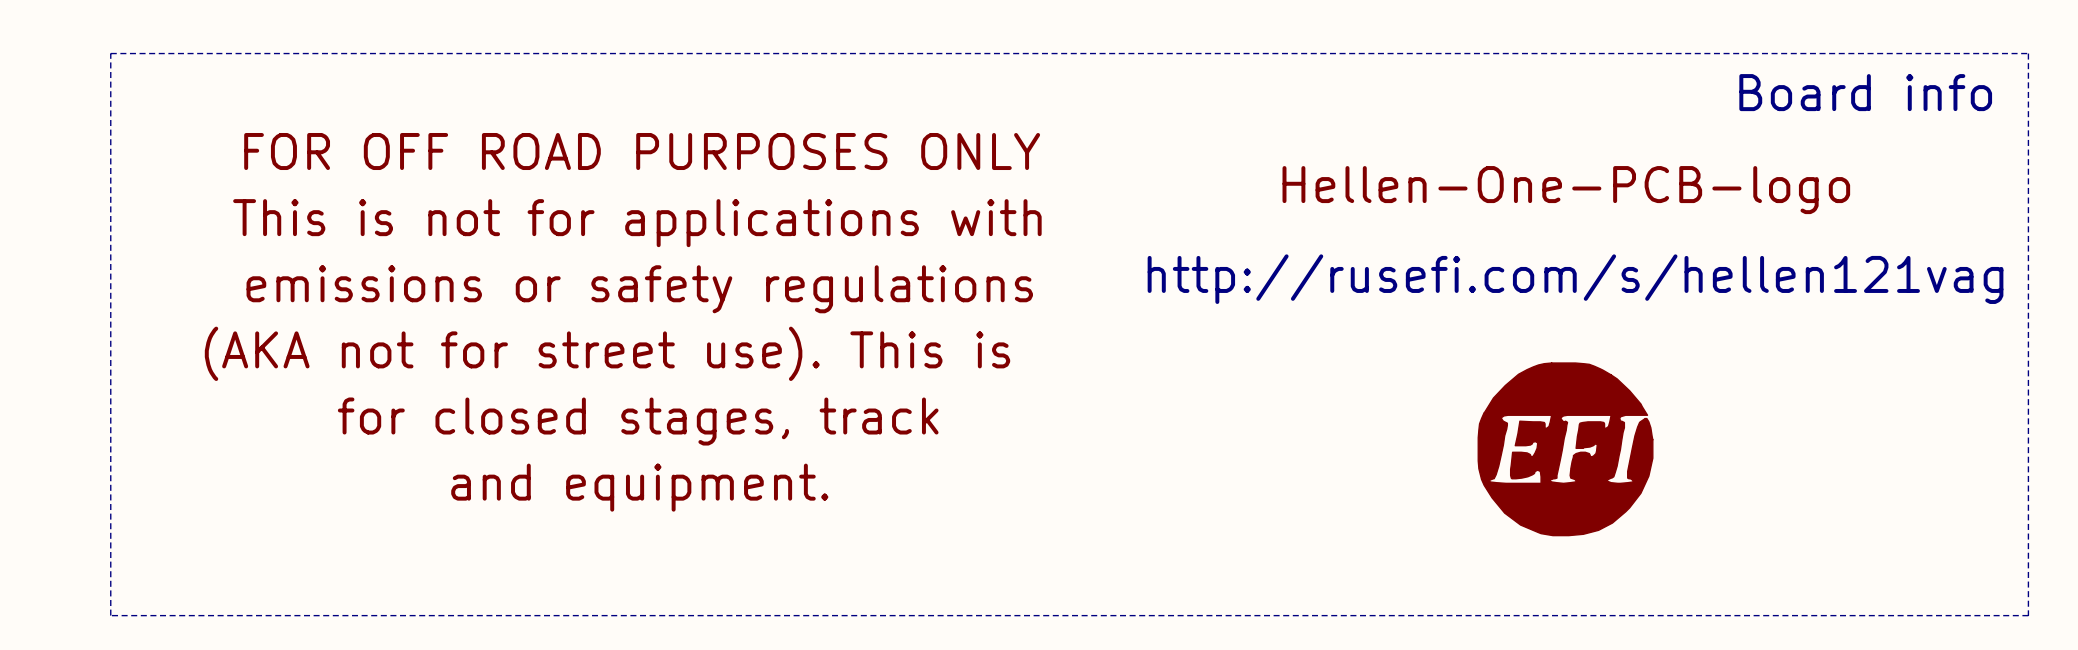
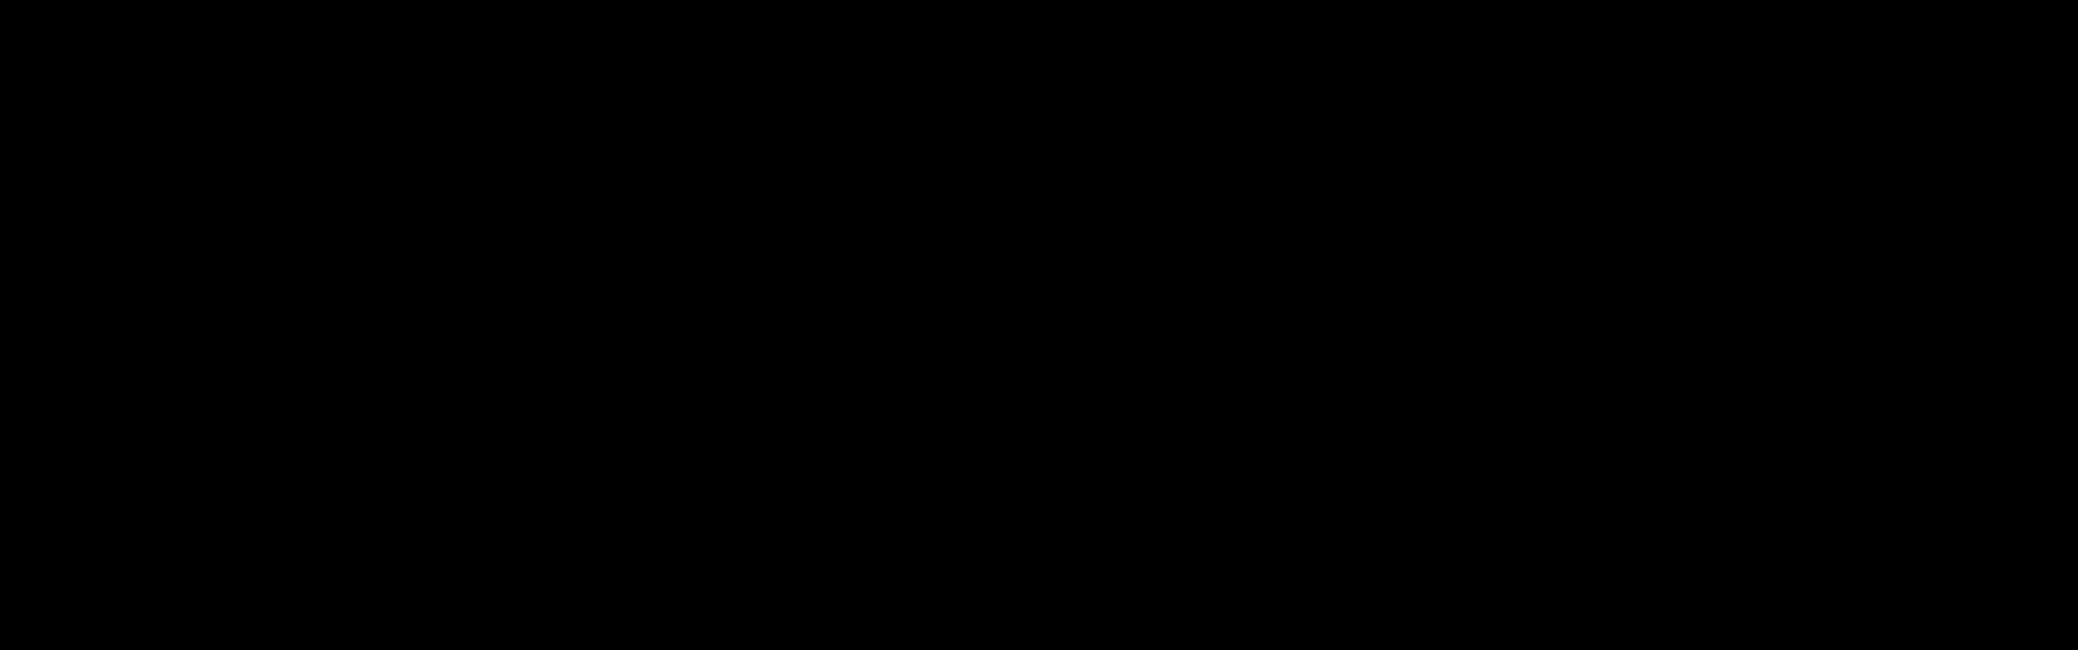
line: (110, 53) (110, 615) (2028, 615) (2028, 53) (110, 53) -> none
text: Board info (1865, 92) -> none
part: (1566, 190) -> none
text: http://rusefi.com/s/hellen121vag (1575, 279) -> none
part: (623, 322) -> none
part: (1565, 449) -> none

